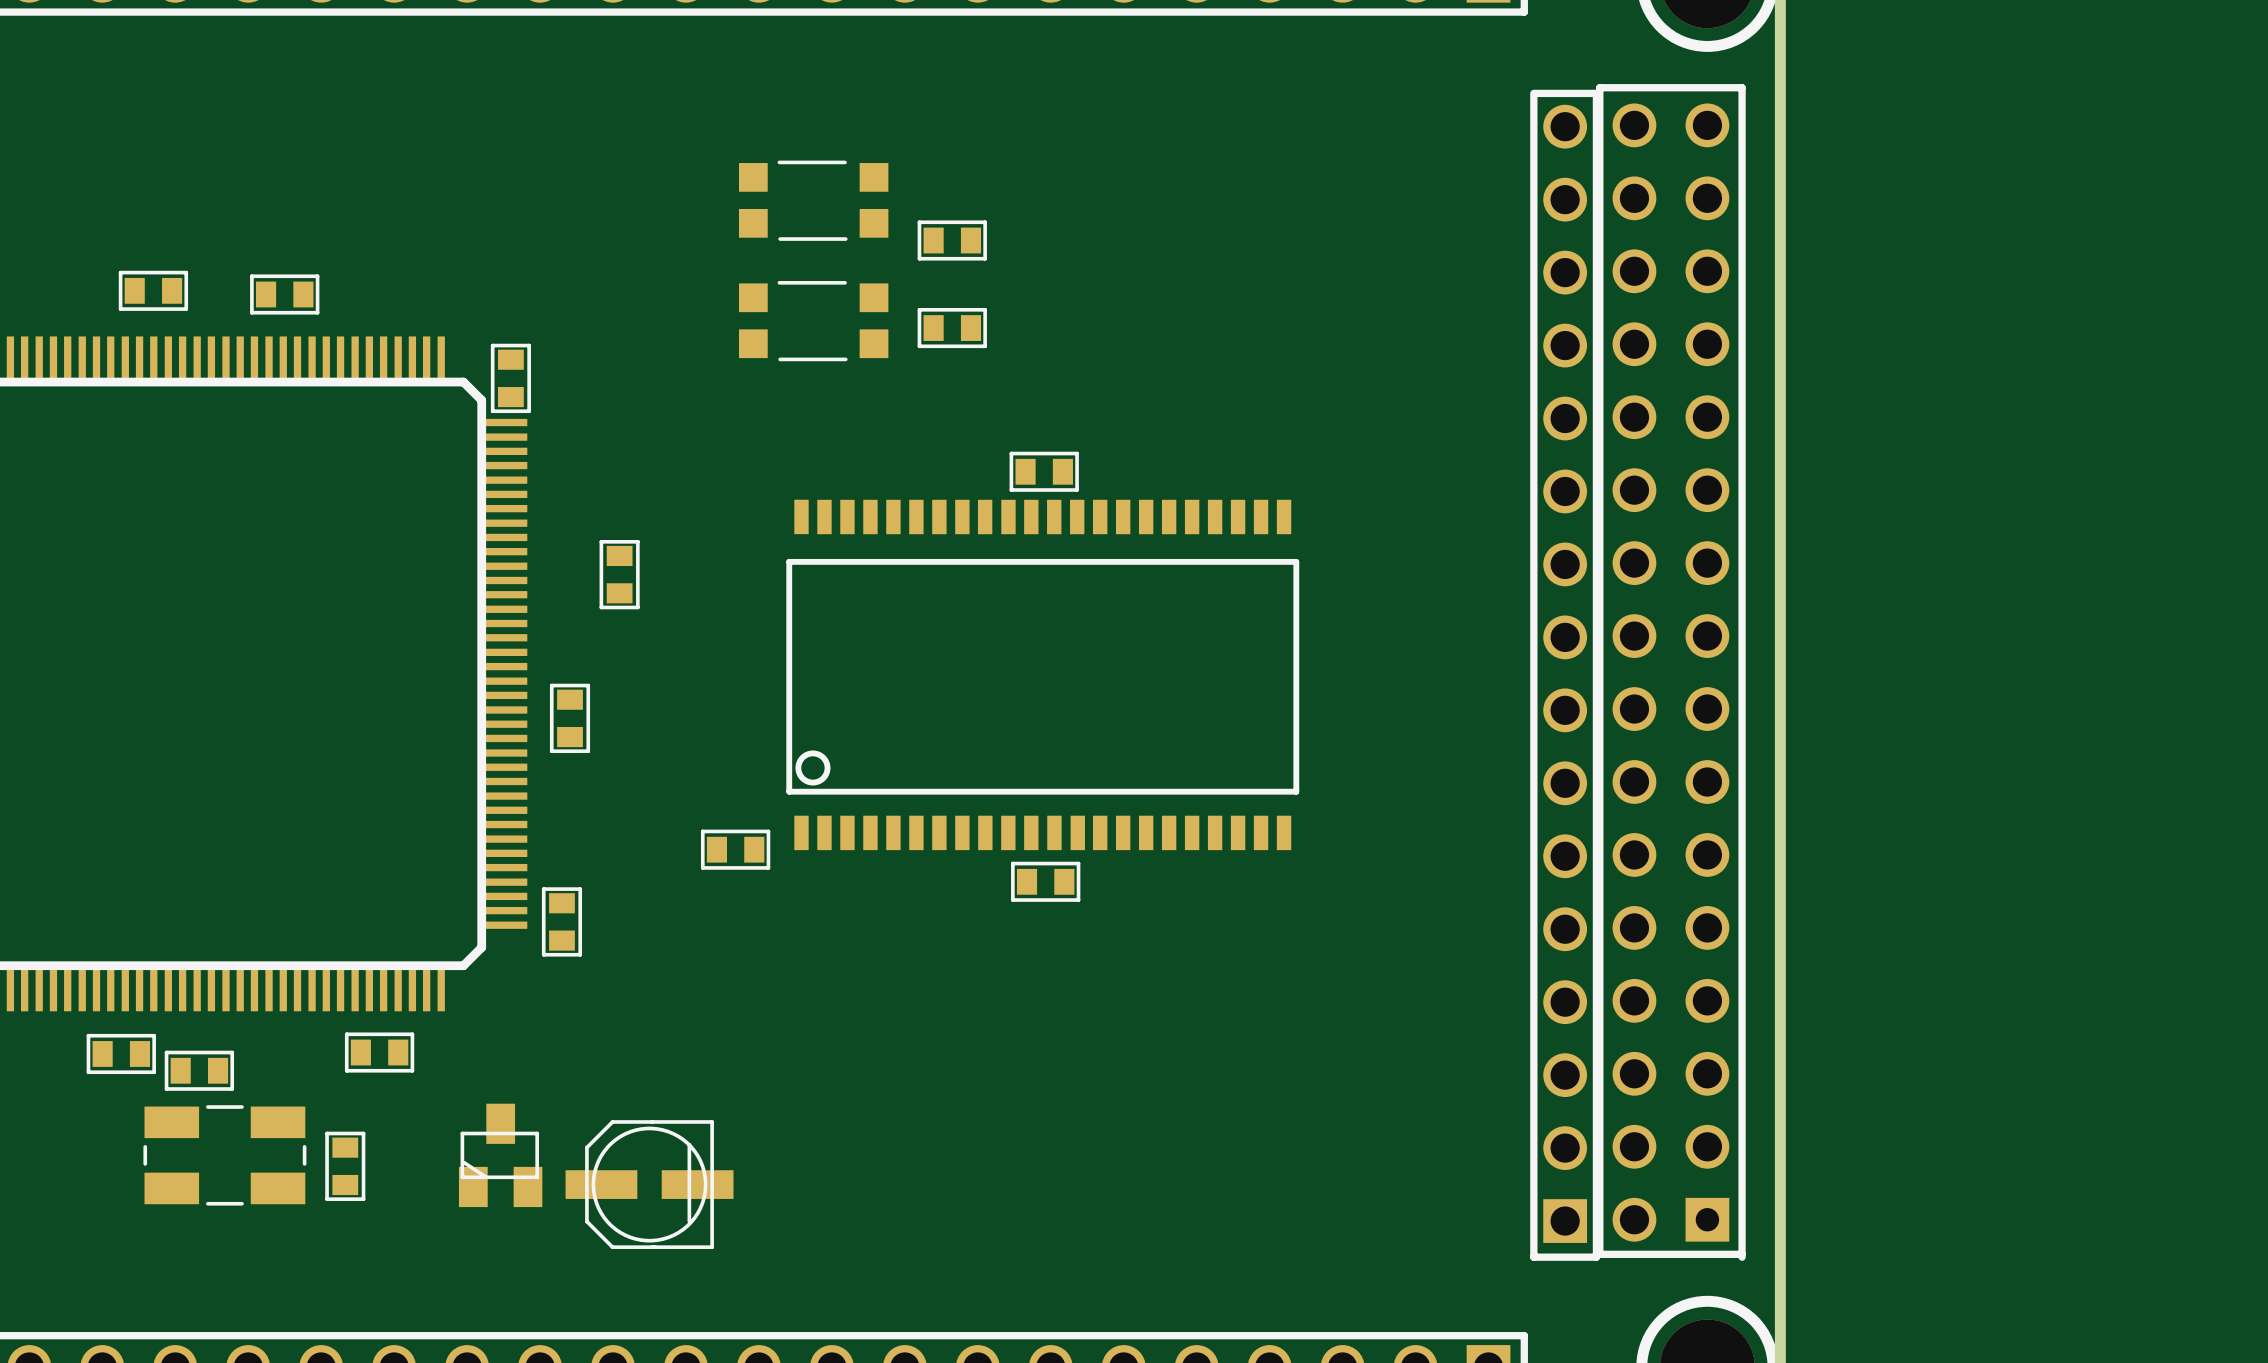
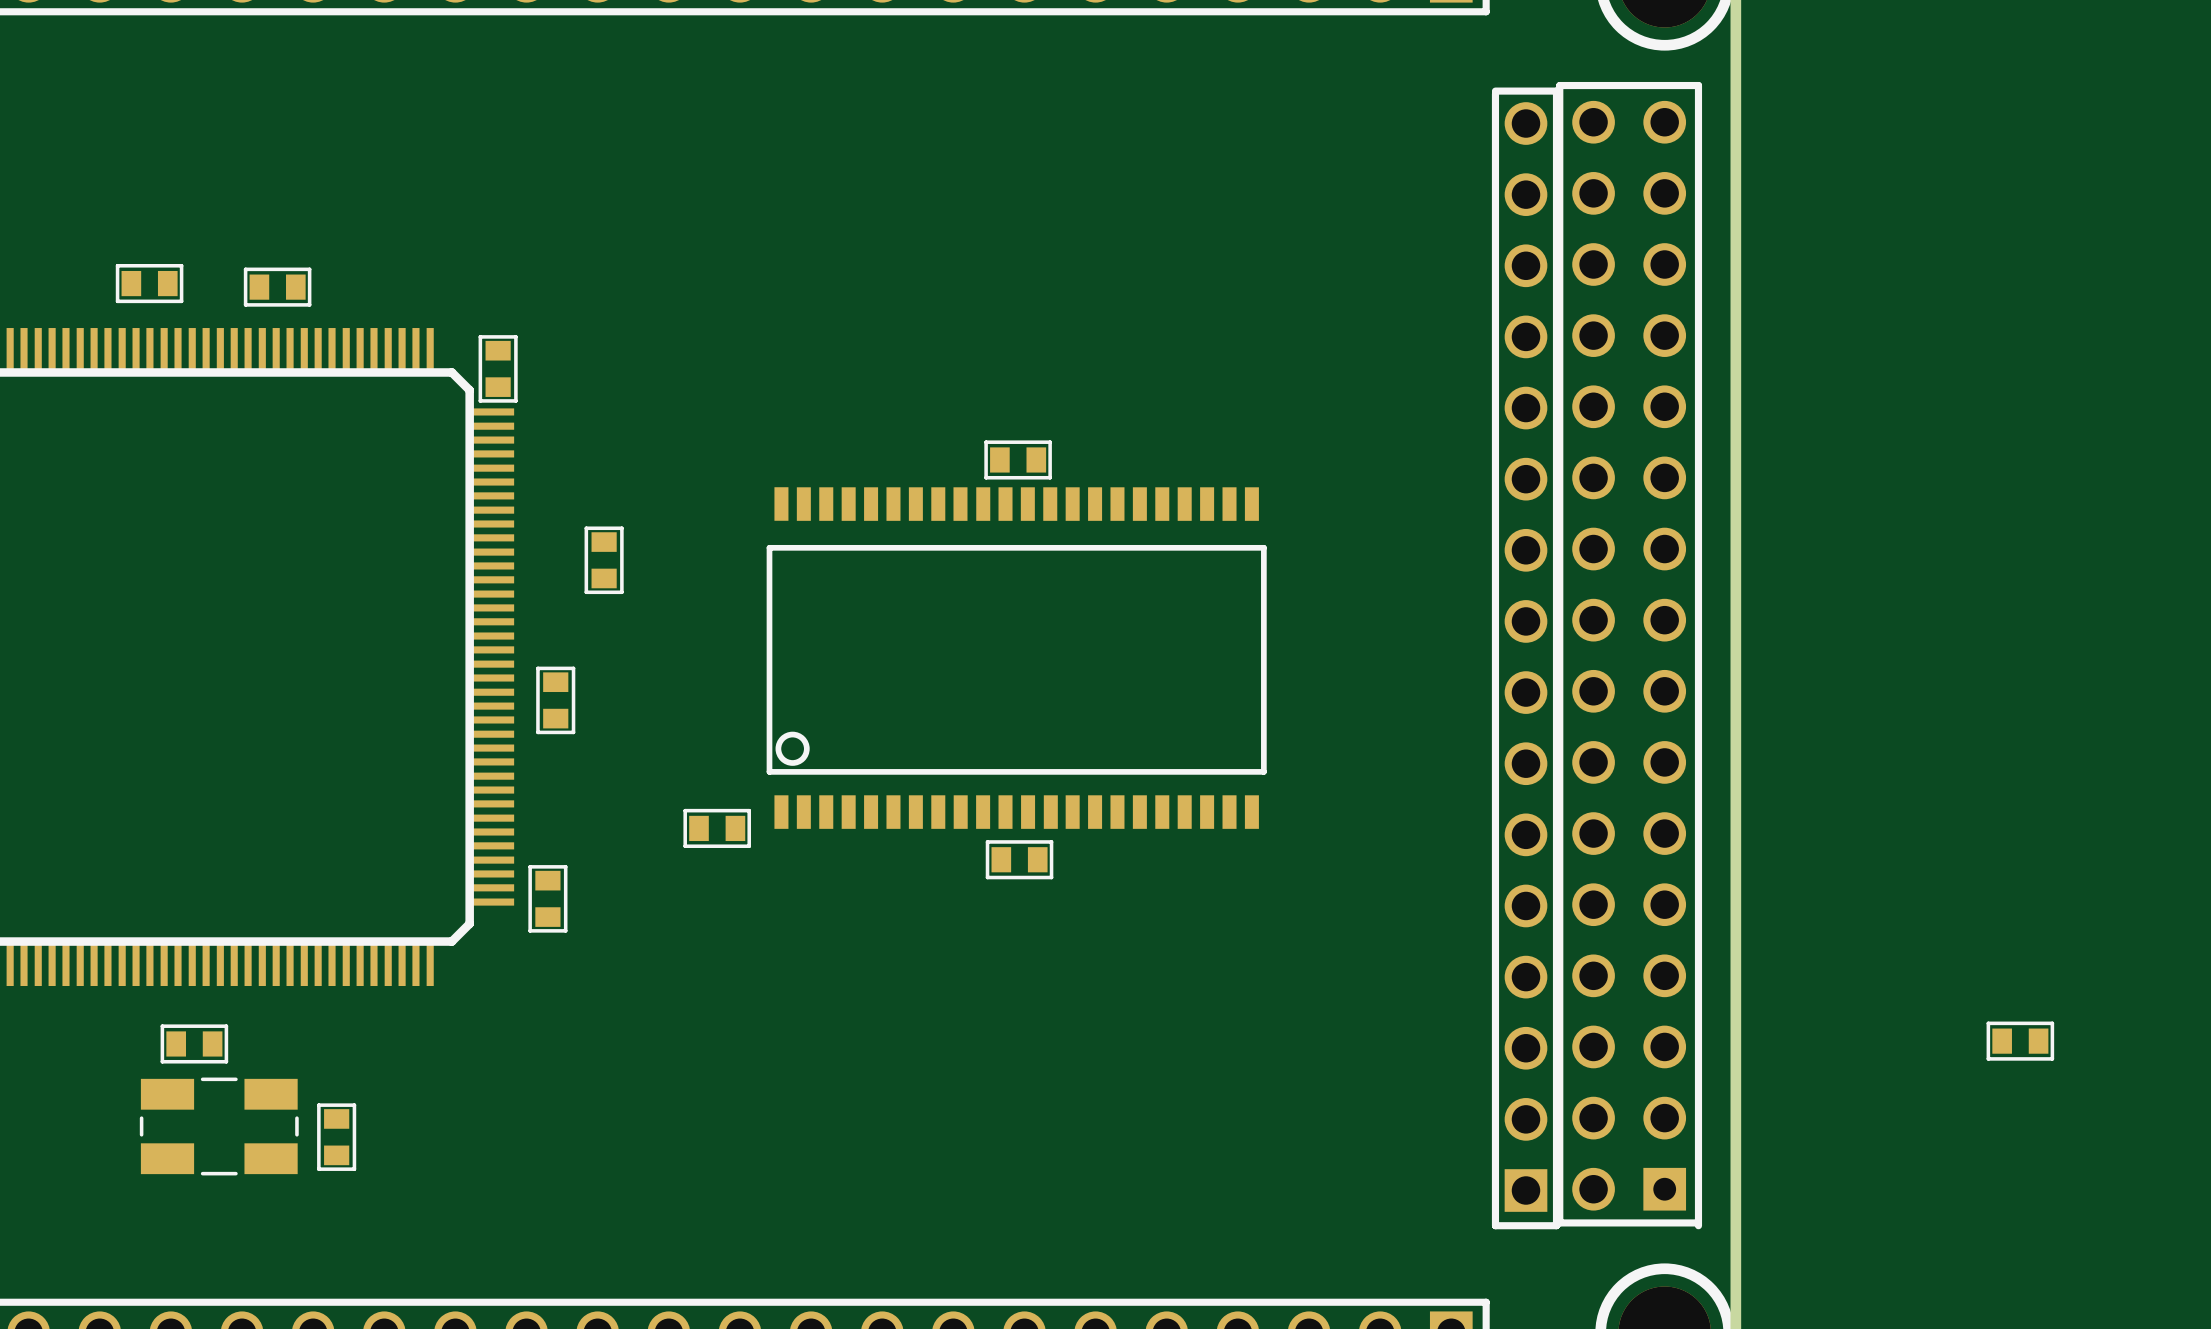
part: (813, 200) -> none
part: (952, 240) -> none
part: (813, 321) -> none
part: (952, 328) -> none
part: (379, 1052) -> none
part: (121, 1053) -> none
part: none -> (2020, 1041)
part: (500, 1155) -> none
part: (649, 1184) -> none

